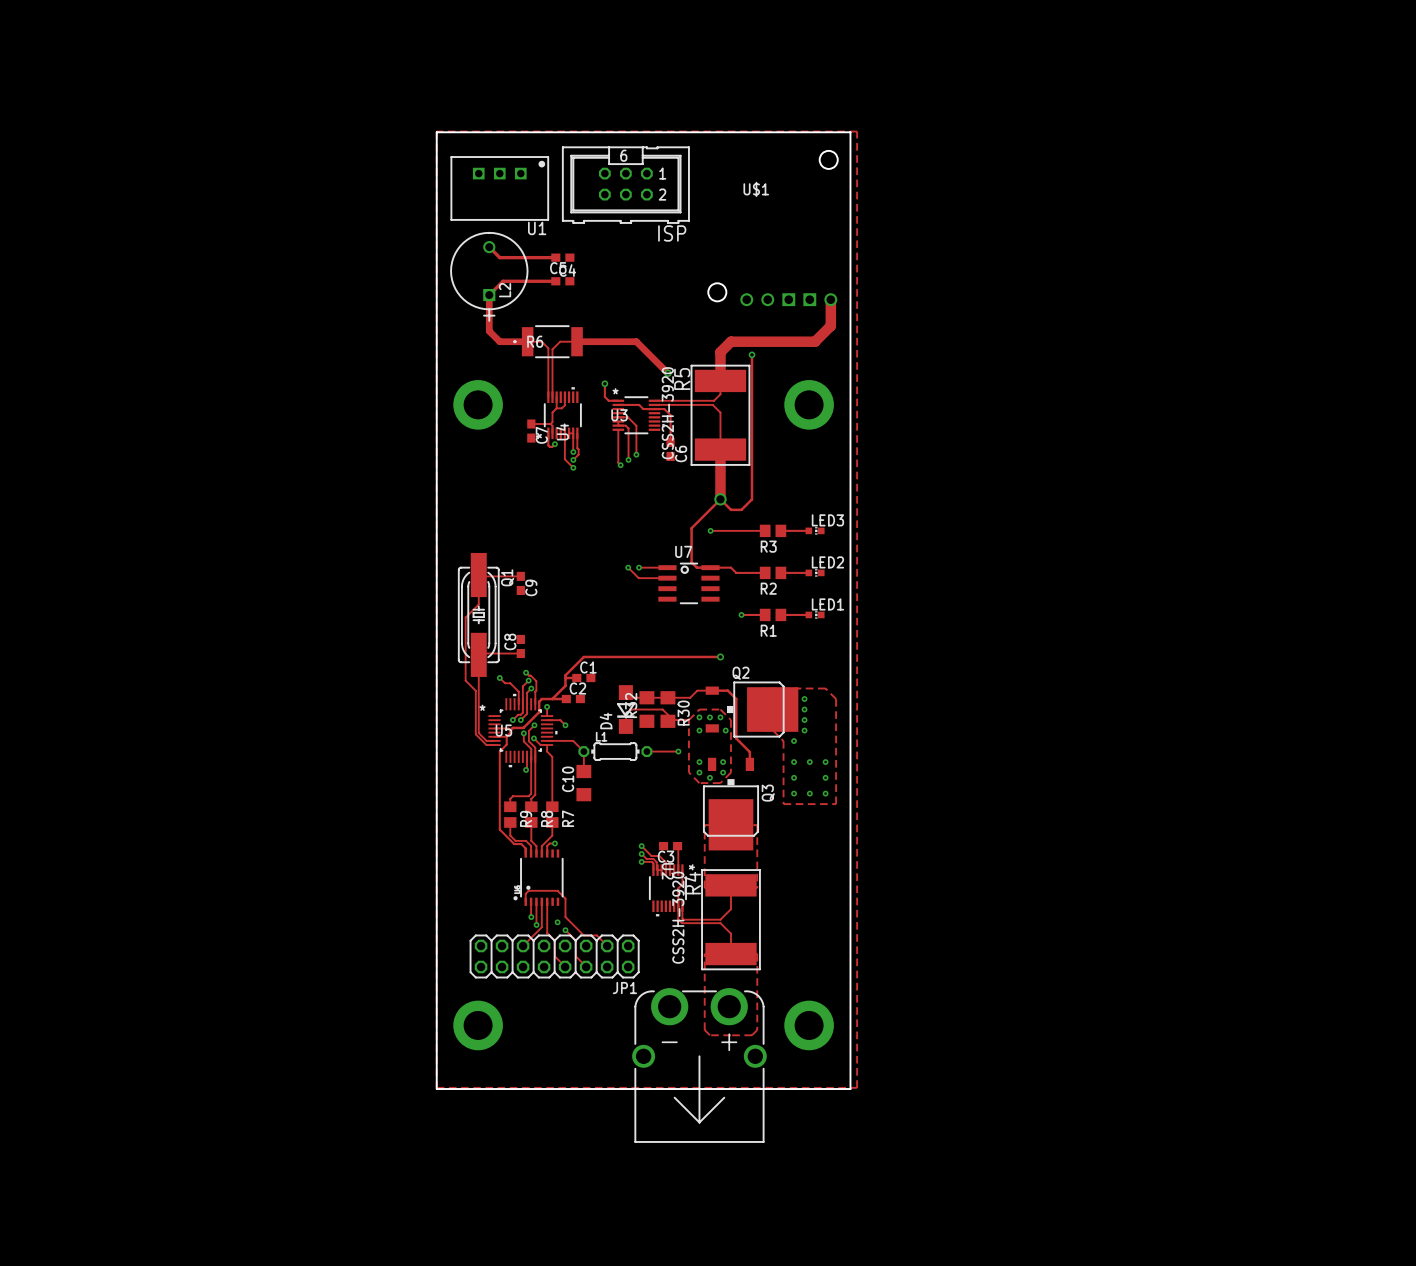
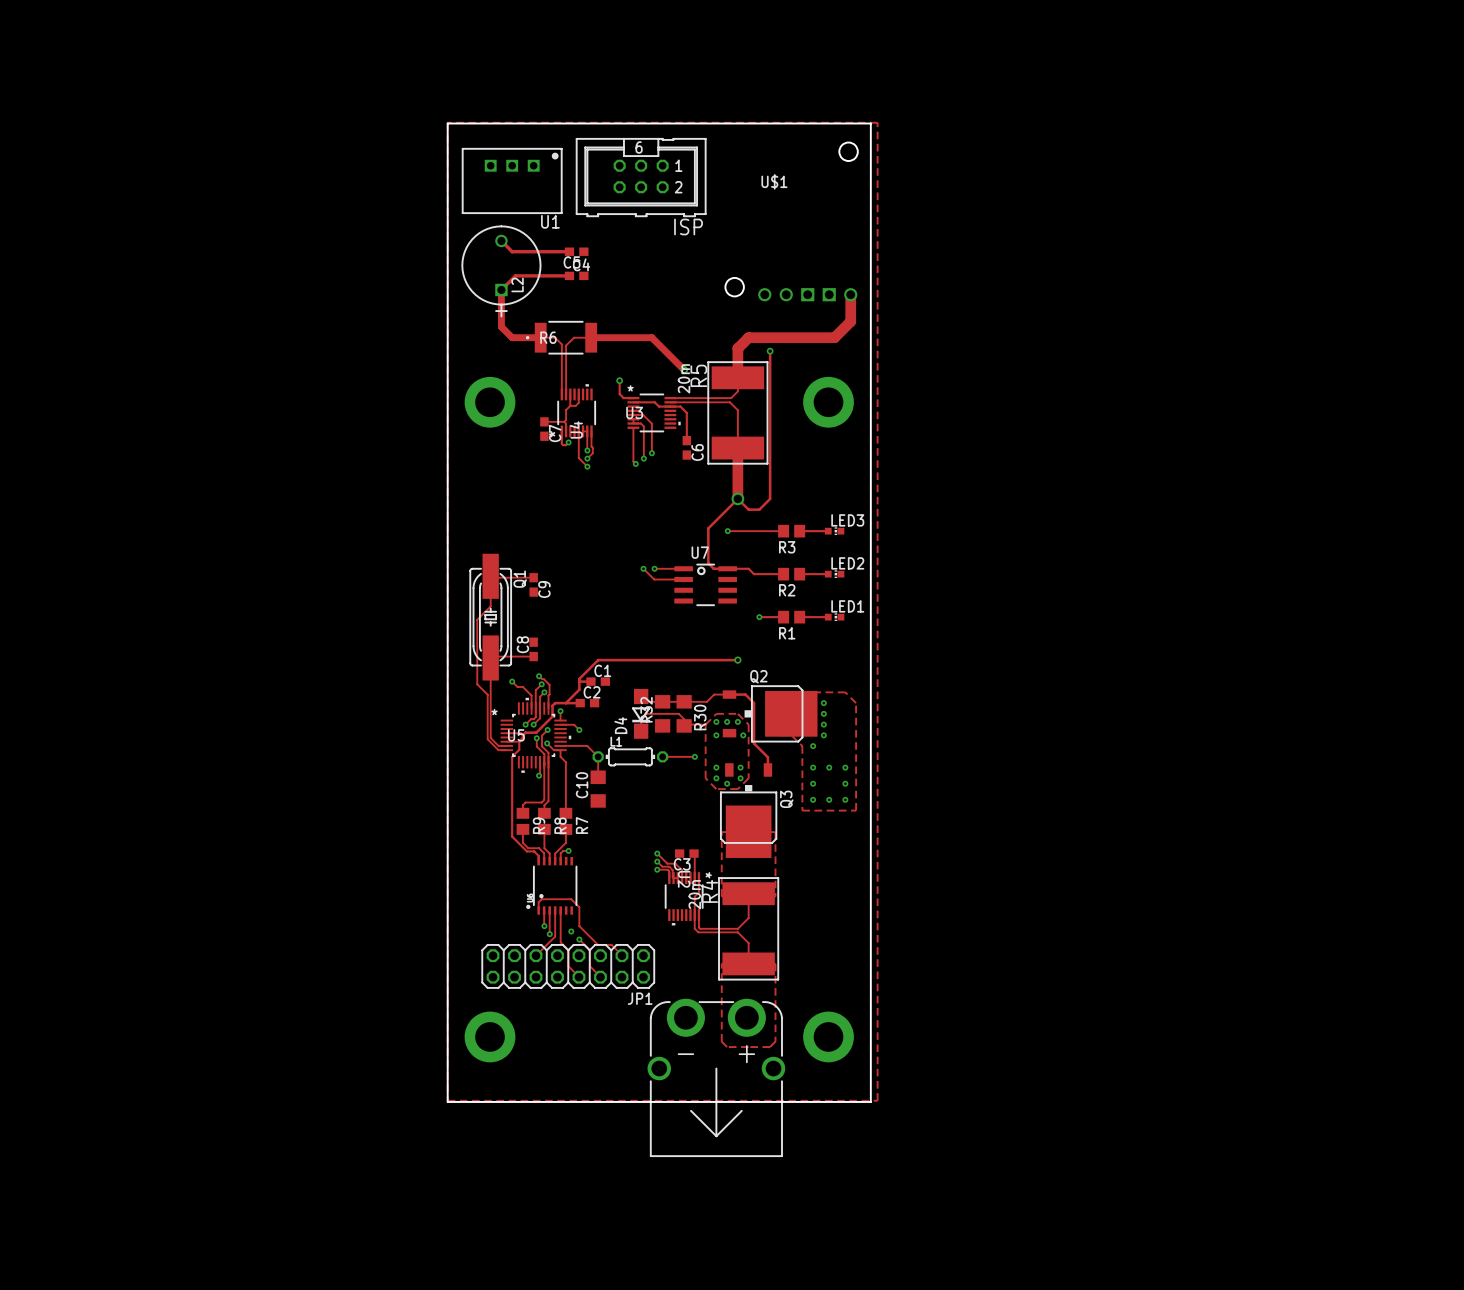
R5 value: CSS2H-3920 (667, 413) -> 20m (684, 378)
R4 value: CSS2H-3920 (678, 917) -> 20m (694, 894)

